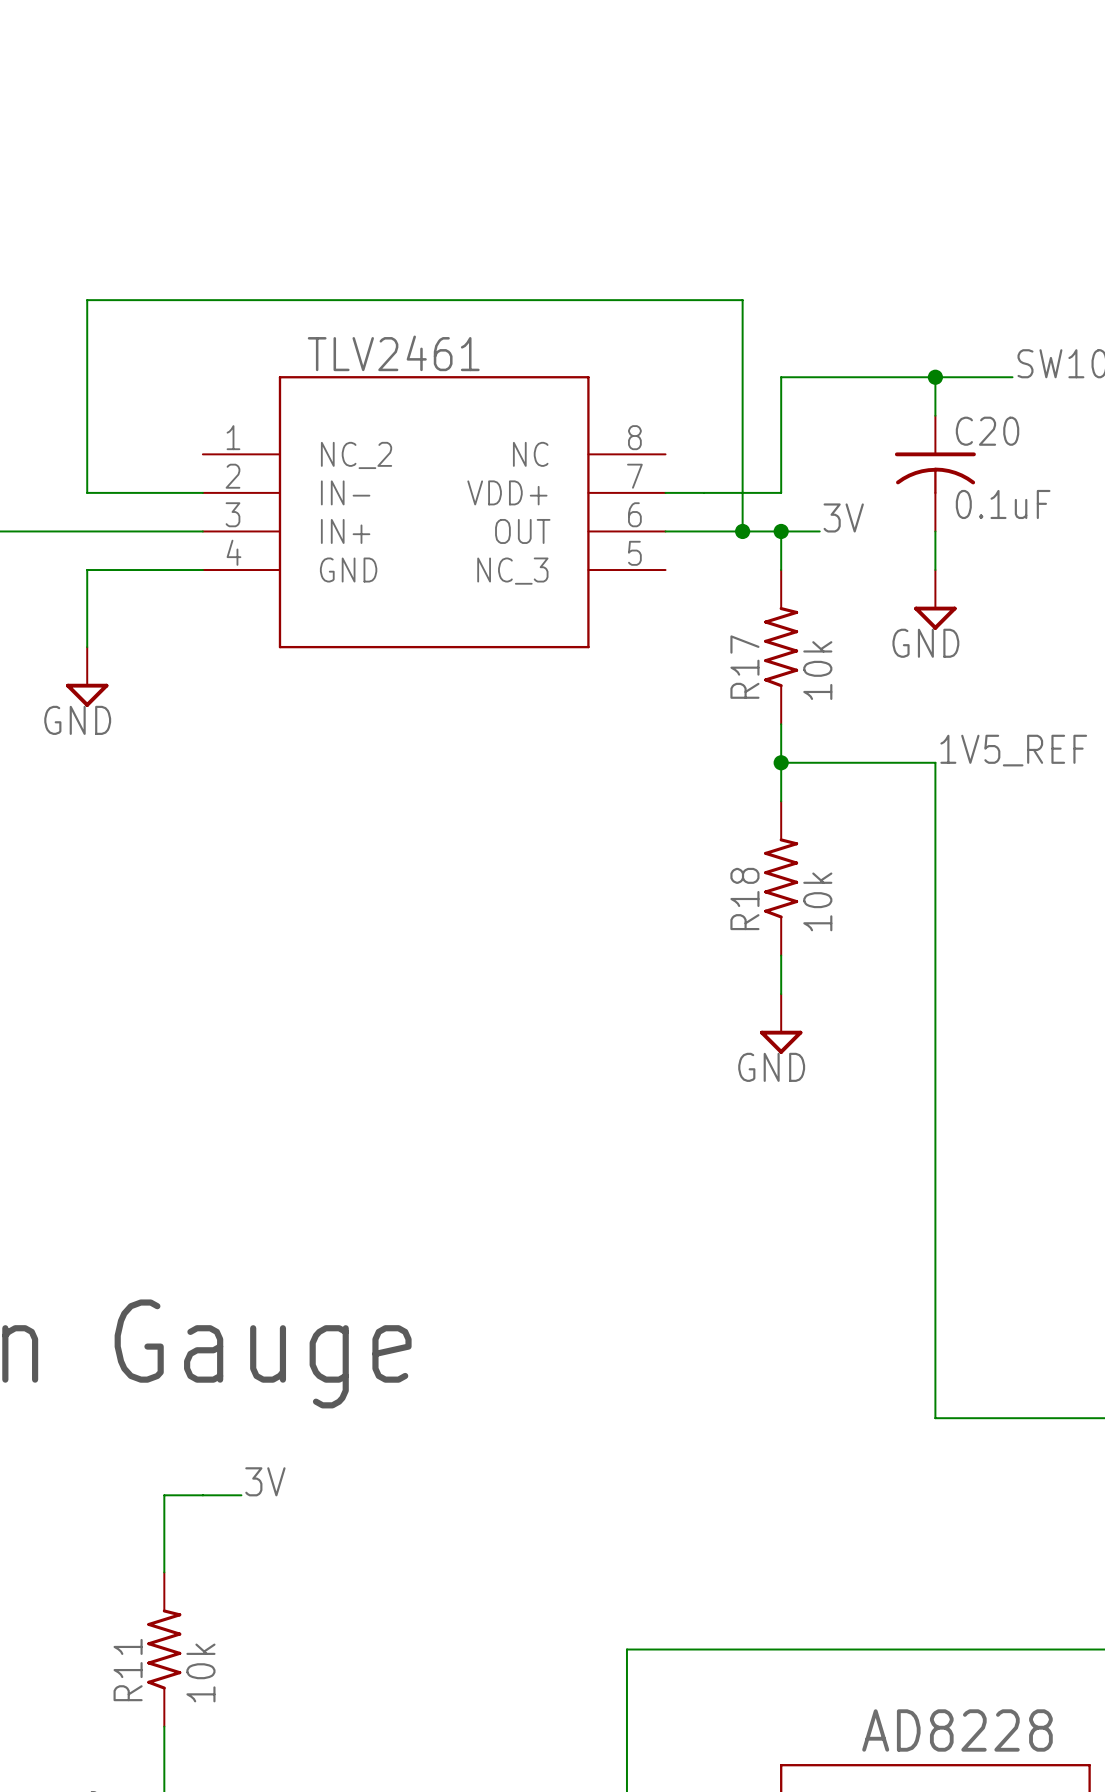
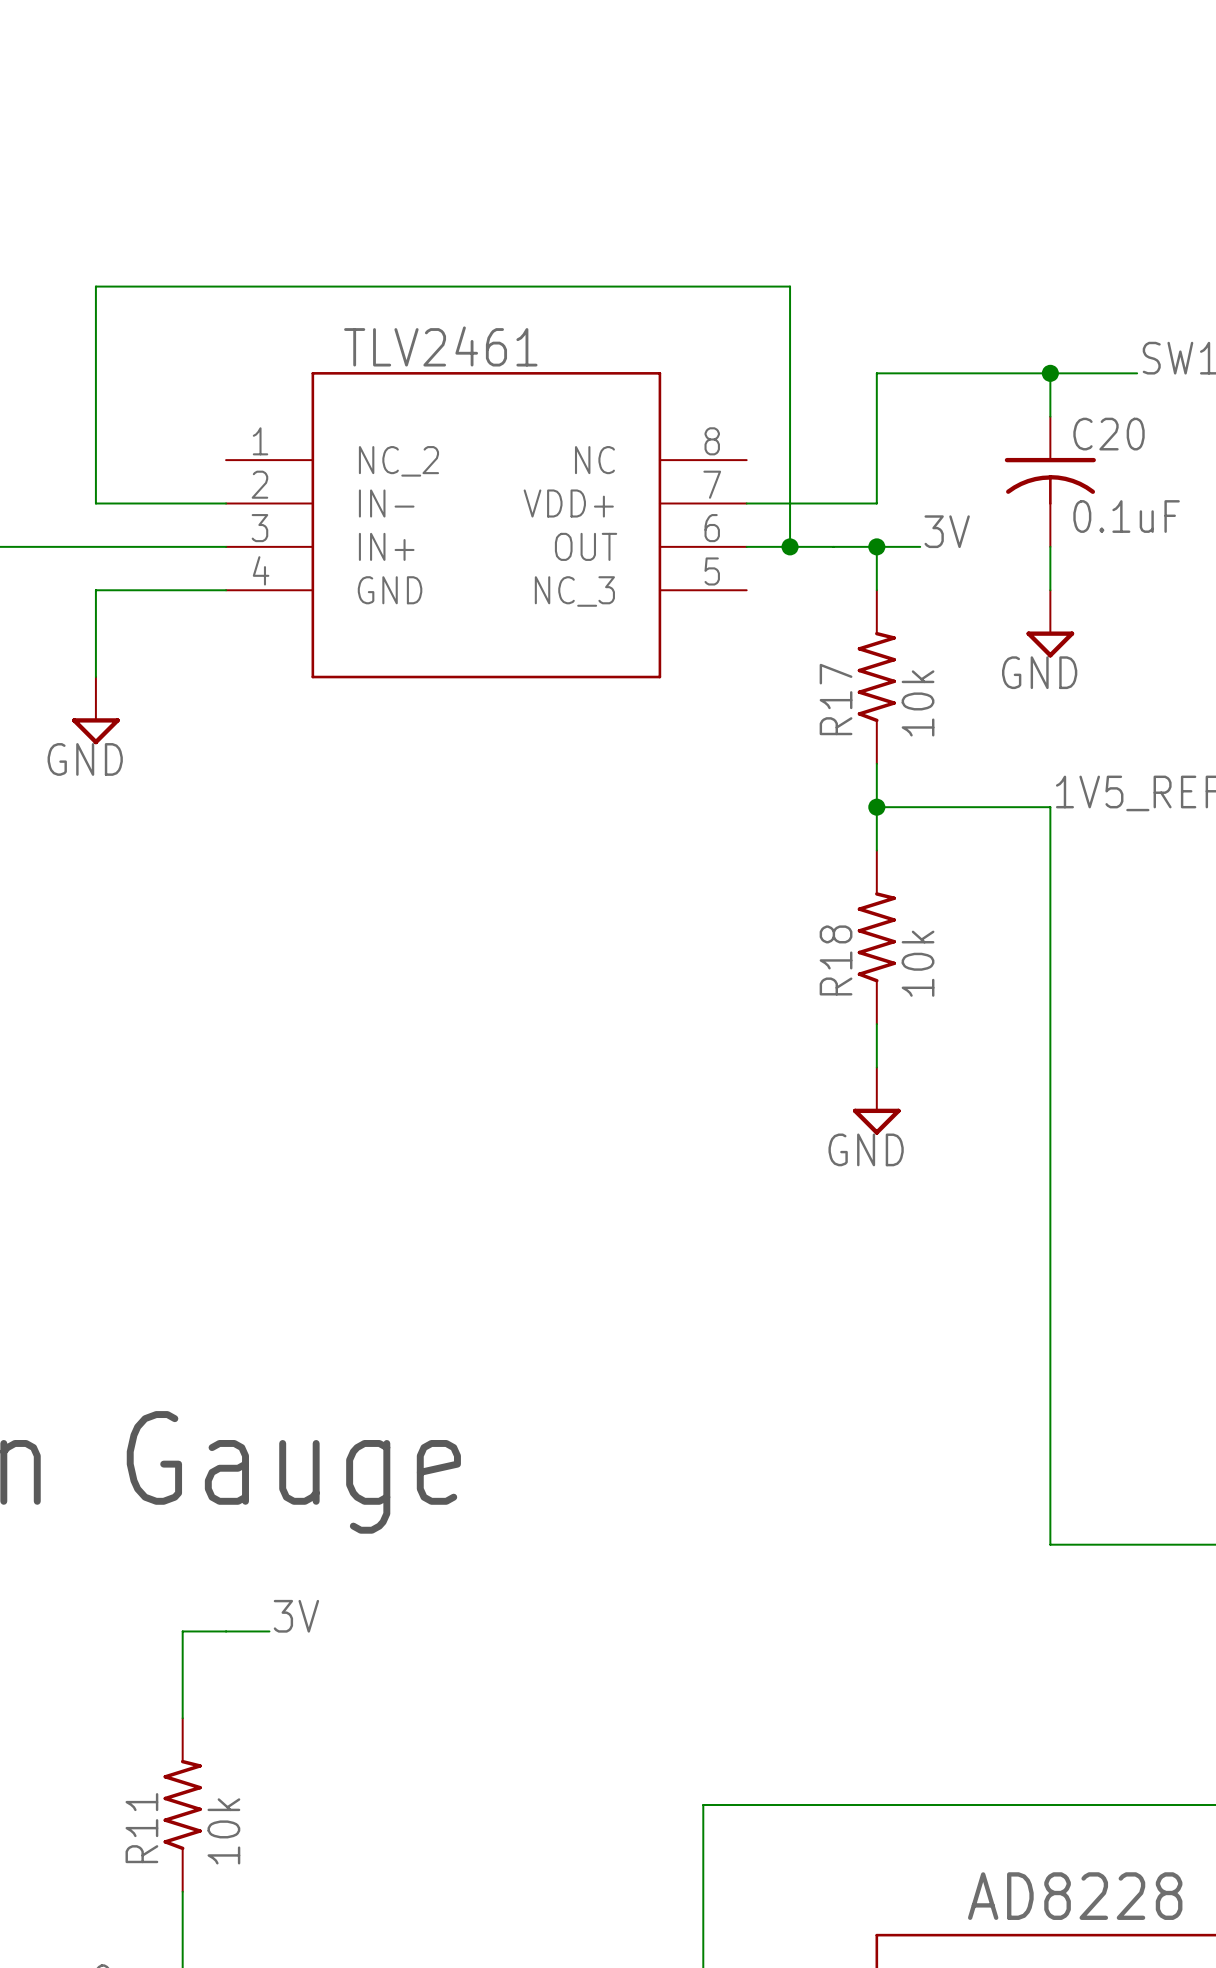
wire: (704, 300) (742, 300) (742, 531) -> (790, 286) (790, 546)
junction position: (742, 531) -> (790, 546)

